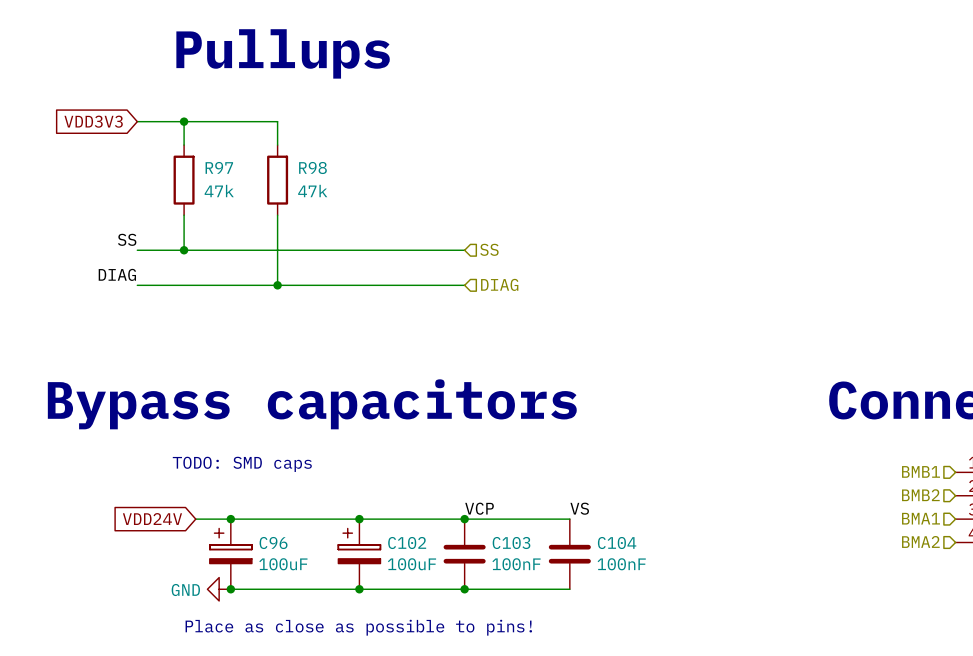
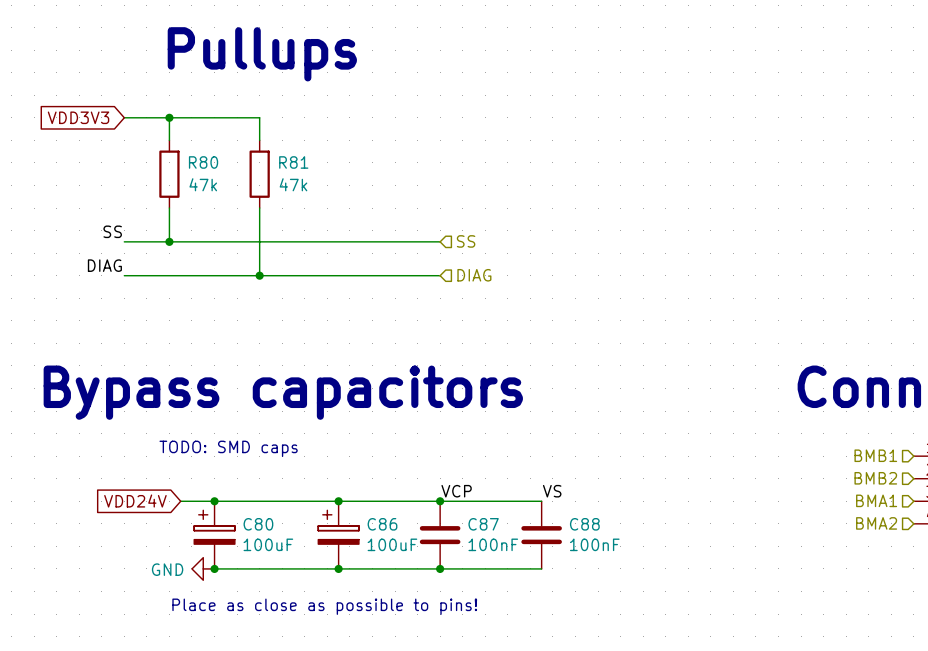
R97 name: R97 (219, 167) -> R80 (203, 162)
R98 name: R98 (312, 167) -> R81 (293, 162)
C96 name: C96 (273, 543) -> C80 (258, 524)
C102 name: C102 (407, 543) -> C86 (382, 524)
C103 name: C103 (511, 543) -> C87 (483, 524)
C104 name: C104 (617, 543) -> C88 (584, 524)

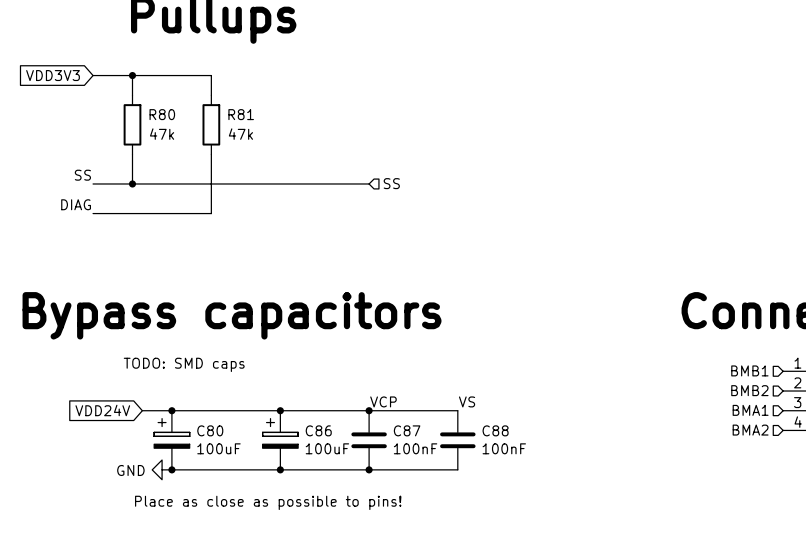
wire: (259, 275) (440, 275) -> none
junction: (259, 275) -> none
hierarchical label: DIAG (474, 275) -> none

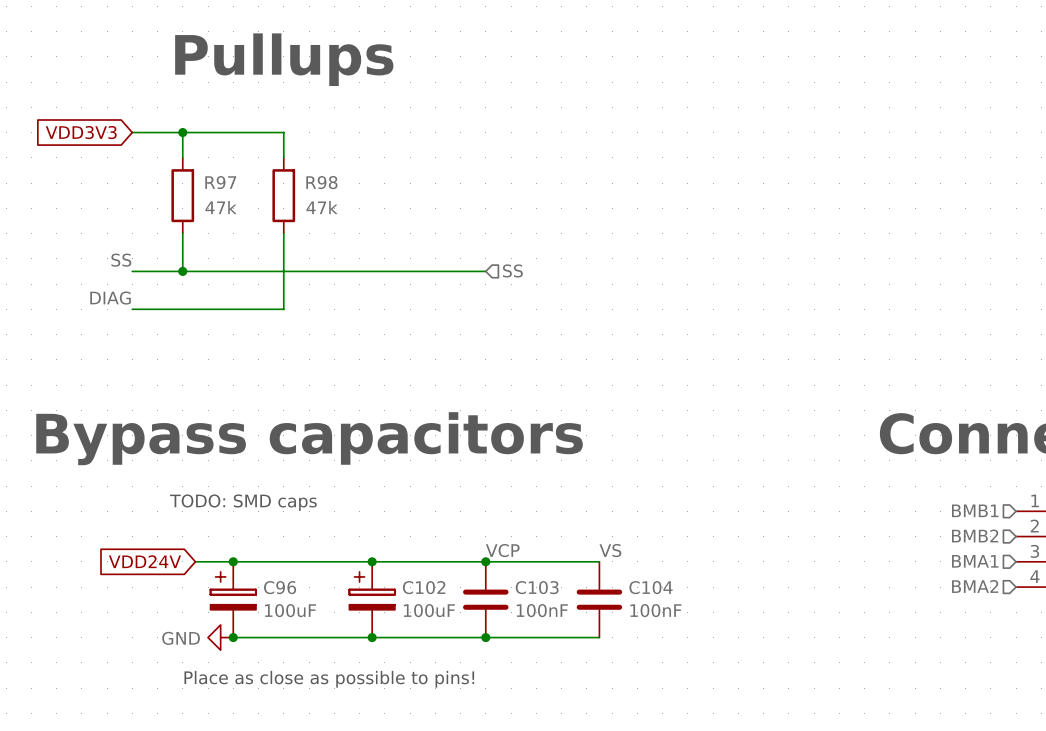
R80 name: R80 (162, 114) -> R97 (220, 182)
R81 name: R81 (241, 114) -> R98 (321, 182)
C80 name: C80 (210, 430) -> C96 (280, 587)
C86 name: C86 (318, 430) -> C102 (424, 587)
C87 name: C87 (407, 430) -> C103 (537, 587)
C88 name: C88 (495, 430) -> C104 (651, 587)

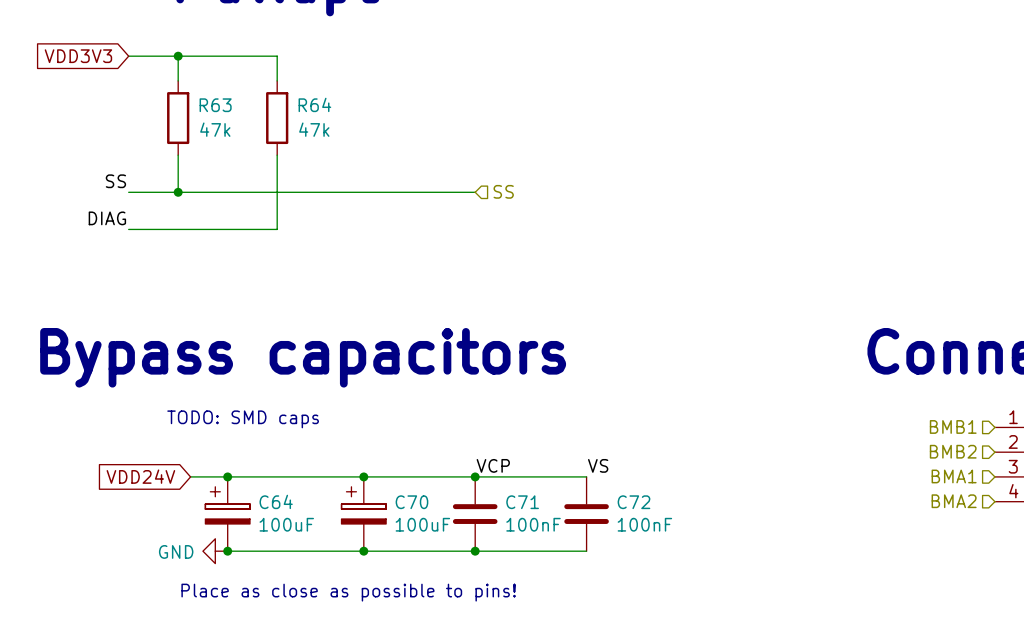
R97 name: R97 (220, 182) -> R63 (215, 105)
R98 name: R98 (321, 182) -> R64 (314, 104)
C96 name: C96 (280, 587) -> C64 (276, 501)
C102 name: C102 (424, 587) -> C70 (411, 502)
C103 name: C103 (537, 587) -> C71 (522, 502)
C104 name: C104 (651, 587) -> C72 (633, 502)

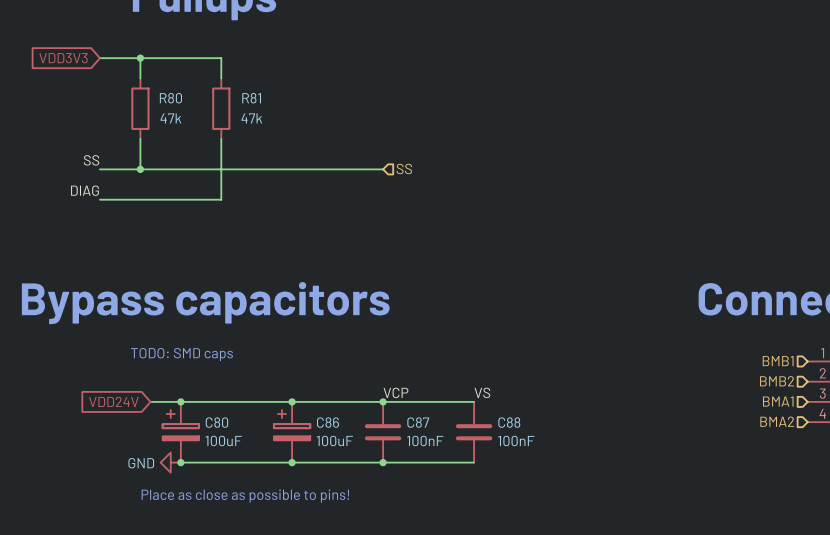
R64 name: R64 (314, 104) -> R81 (251, 98)
R63 name: R63 (215, 105) -> R80 (170, 98)
C64 name: C64 (276, 501) -> C80 (216, 422)
C70 name: C70 (411, 502) -> C86 (327, 422)
C71 name: C71 (522, 502) -> C87 (418, 422)
C72 name: C72 (633, 502) -> C88 (509, 422)

